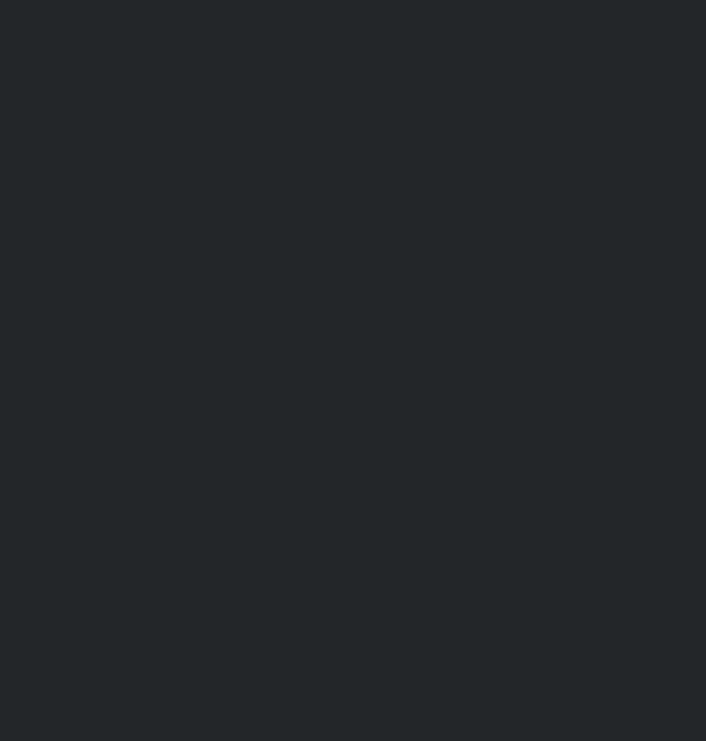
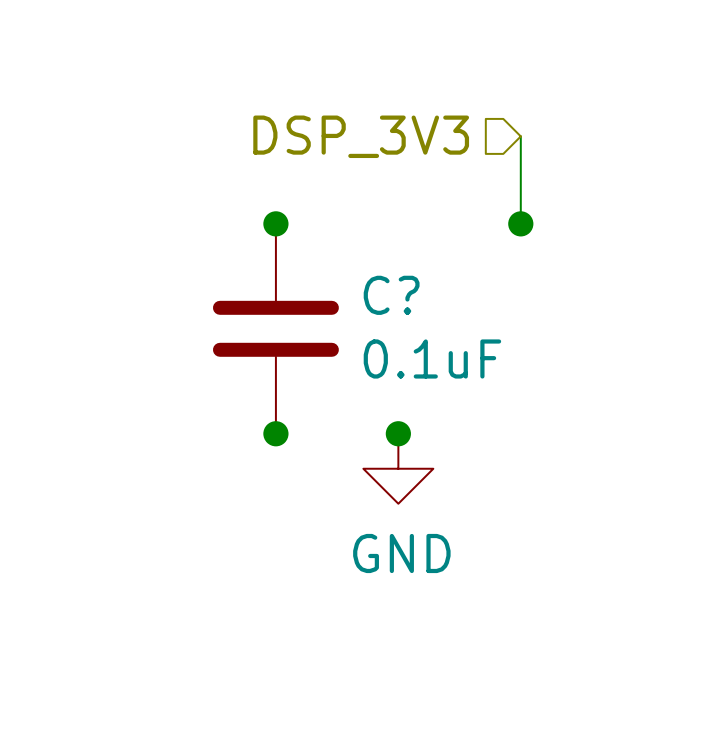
wire: none -> (520, 136) (520, 223)
hierarchical label: none -> DSP_3V3 (361, 136)
junction: none -> (275, 223)
junction: none -> (520, 223)
C?: none -> 0.1uF (275, 328)
junction: none -> (275, 433)
junction: none -> (398, 433)
power symbol: none -> GND (398, 468)

